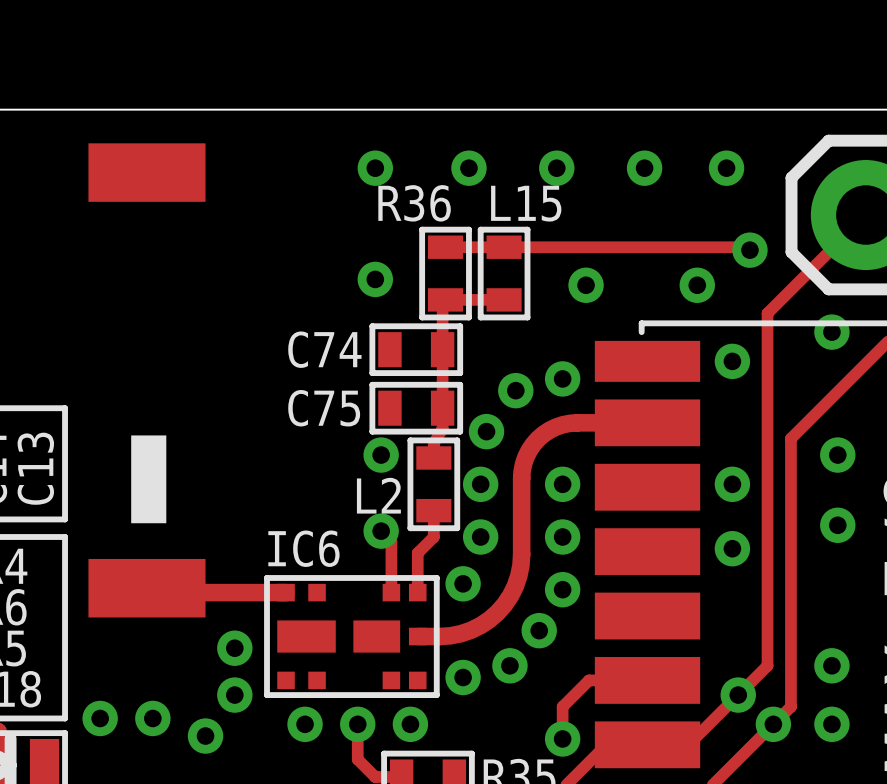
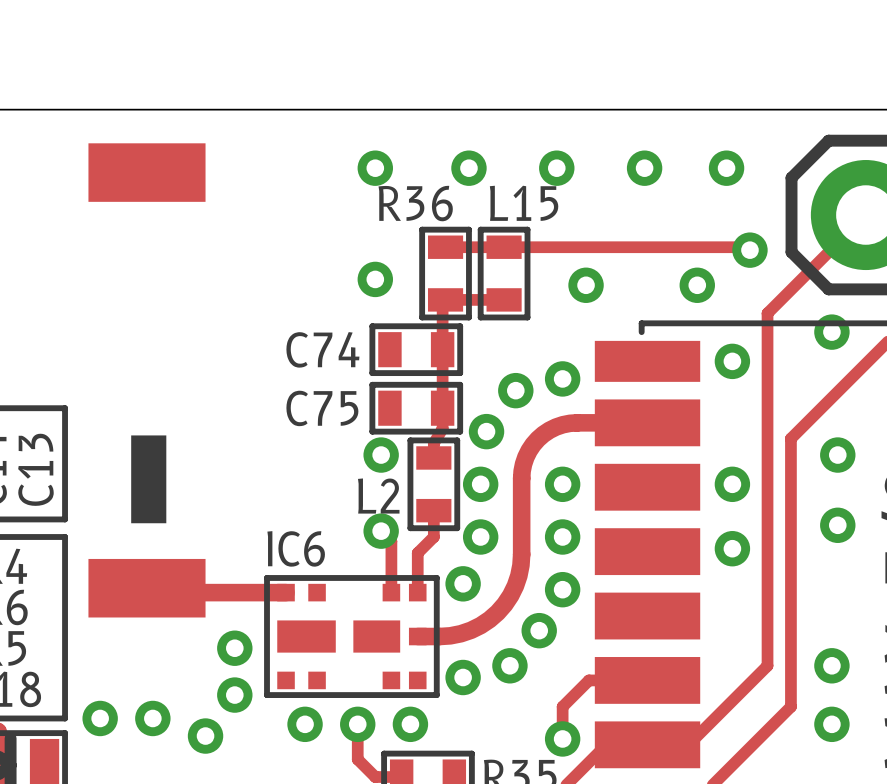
via: (738, 695) -> none
via: (773, 724) -> none

